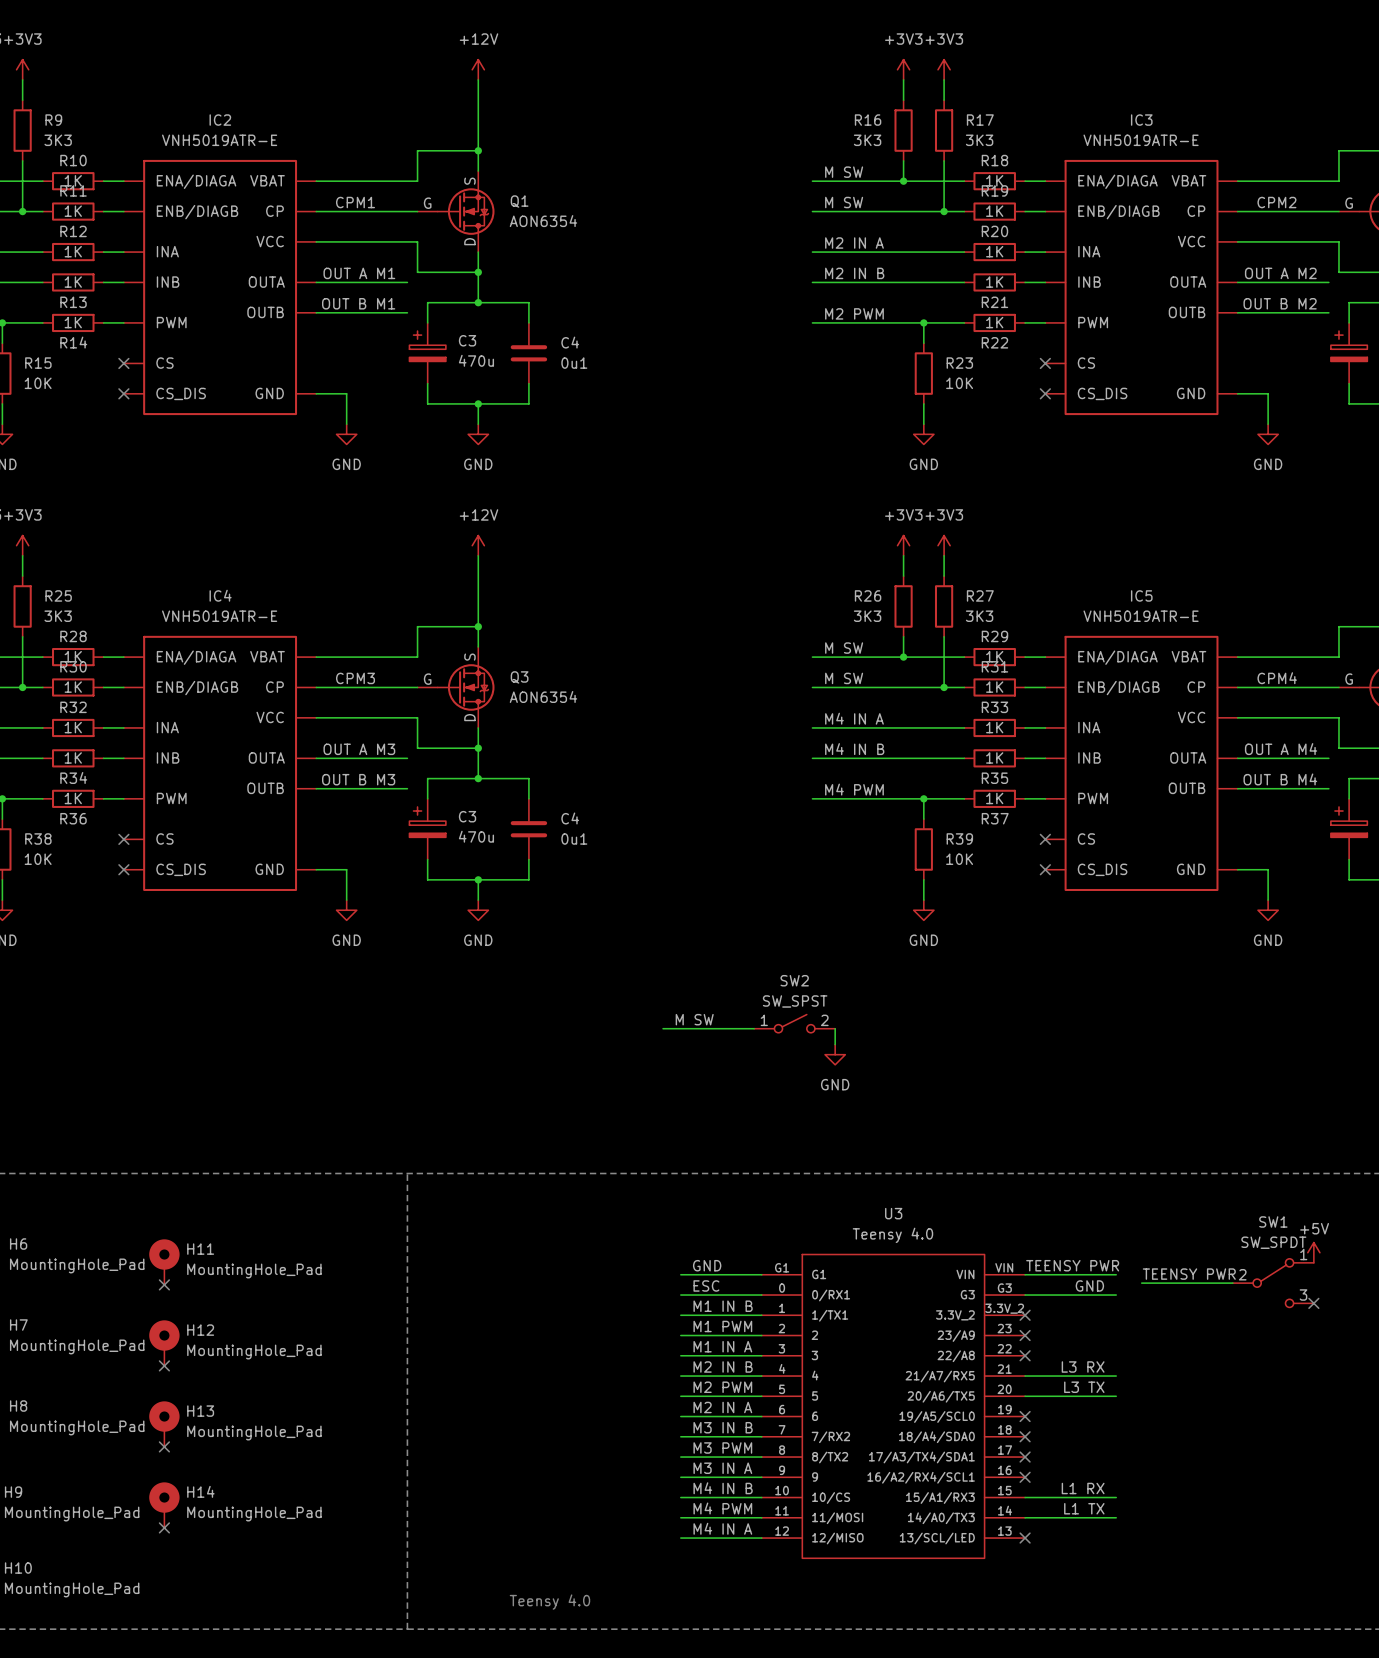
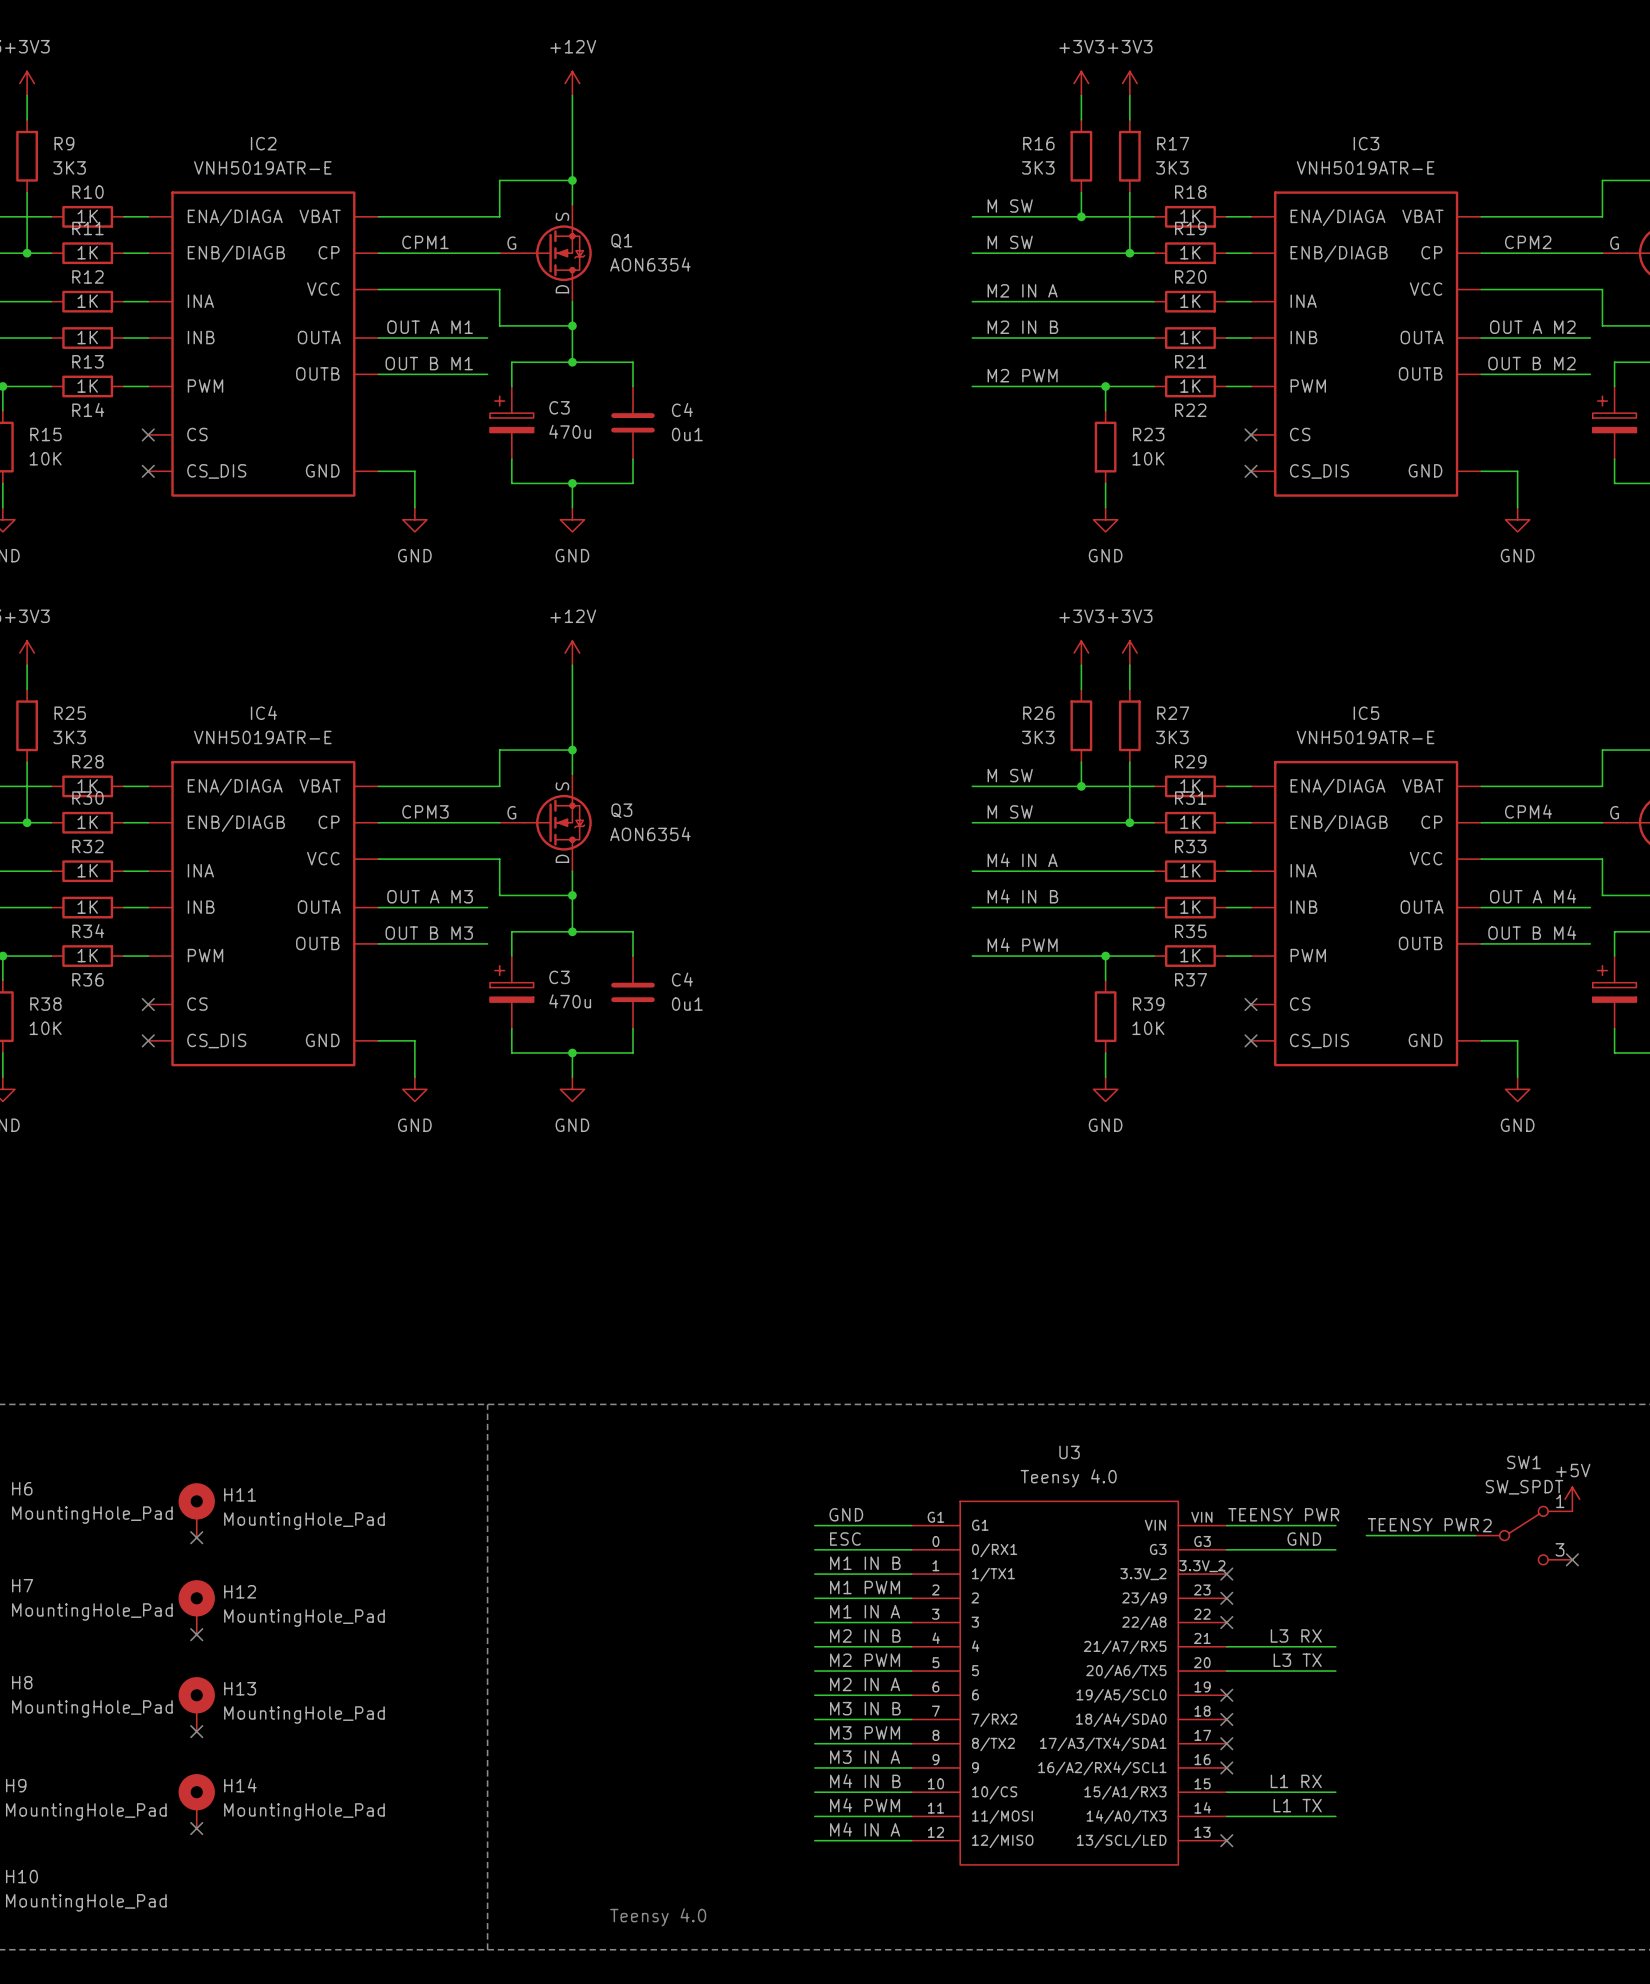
label: M SW (694, 1019) -> none
SW2: SW_SPST (794, 1023) -> none
wire: (663, 1028) (754, 1028) -> none
wire: (835, 1028) (835, 1044) -> none
power symbol: GND (835, 1054) -> none

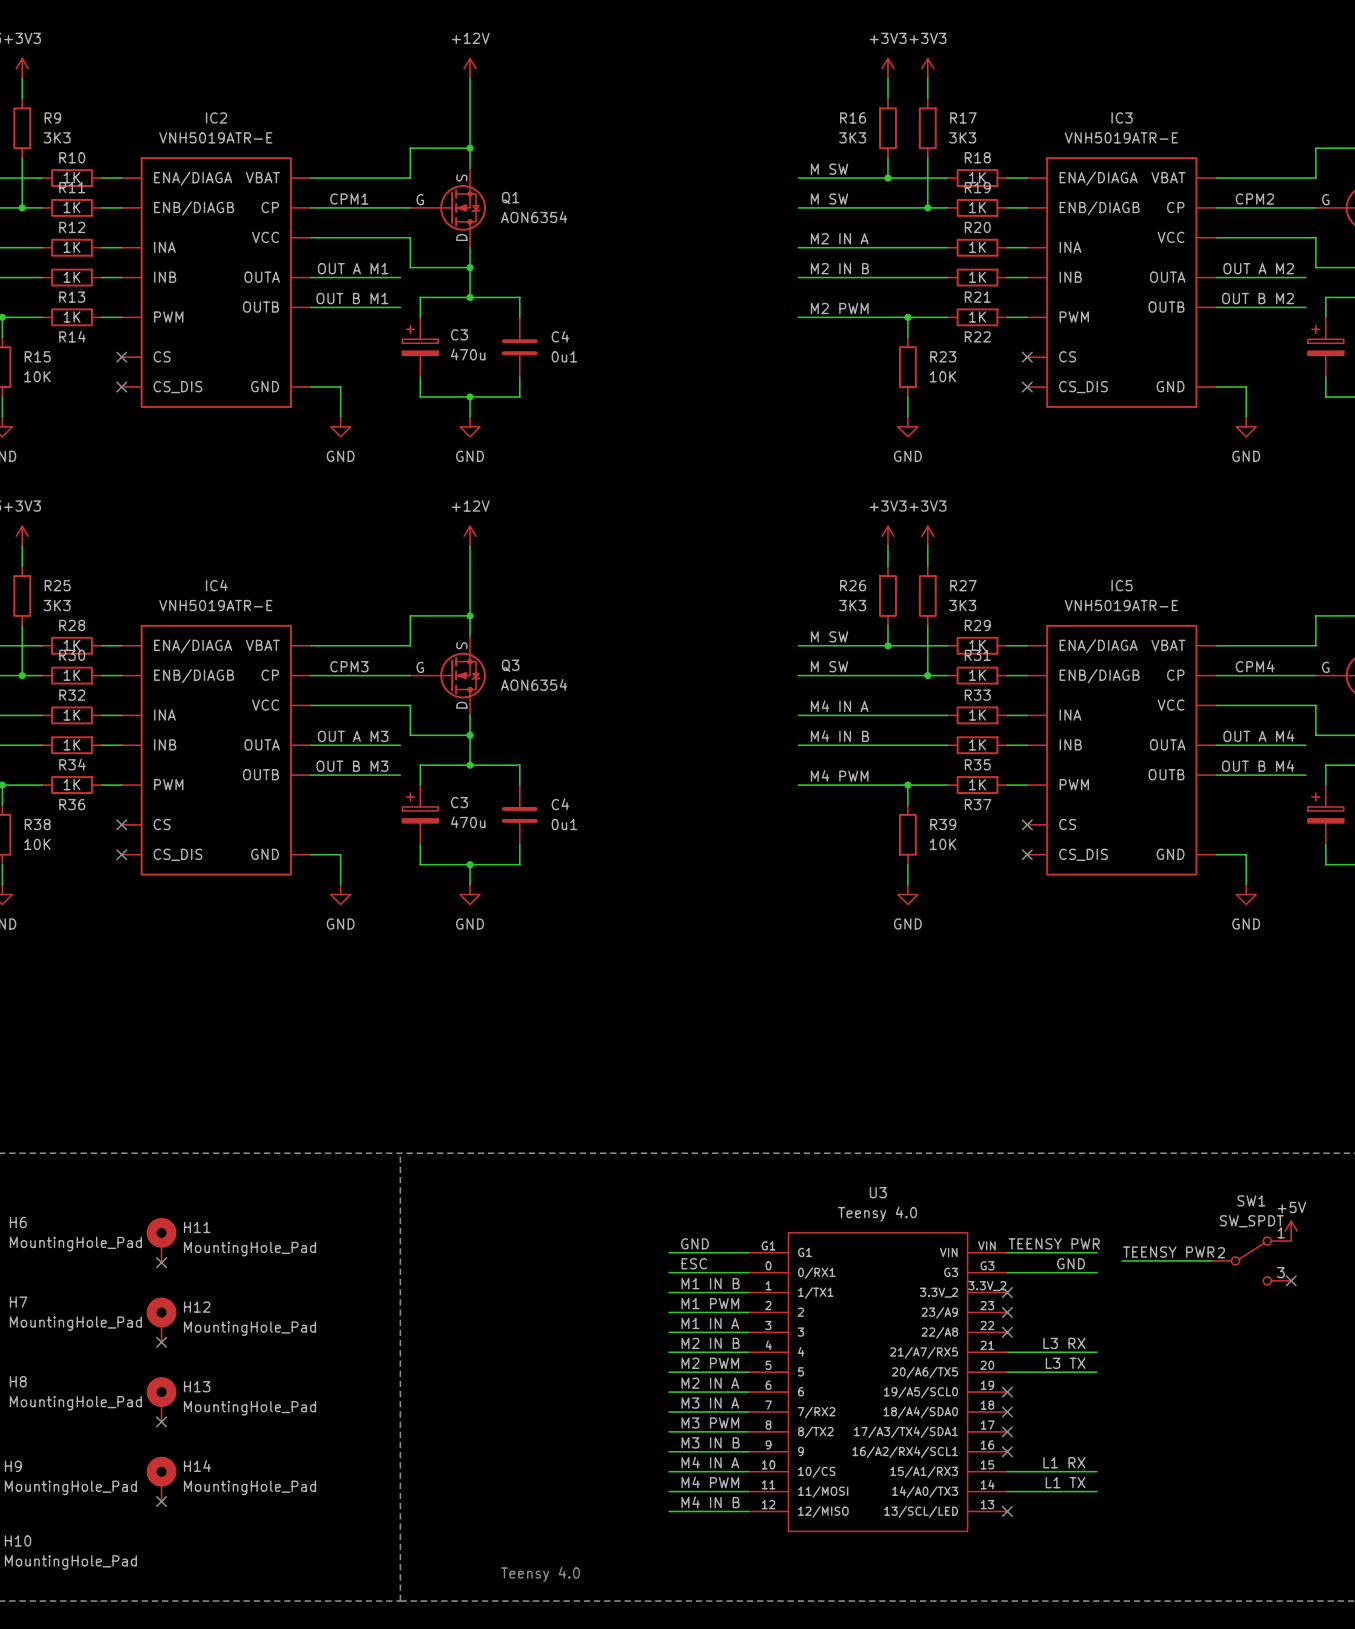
label: M3 IN B (865, 1708) -> M3 IN A (710, 1403)
label: M3 IN A (865, 1757) -> M3 IN B (710, 1442)
label: M4 IN B (865, 1781) -> M4 IN A (710, 1462)
label: M4 IN A (865, 1829) -> M4 IN B (710, 1502)

